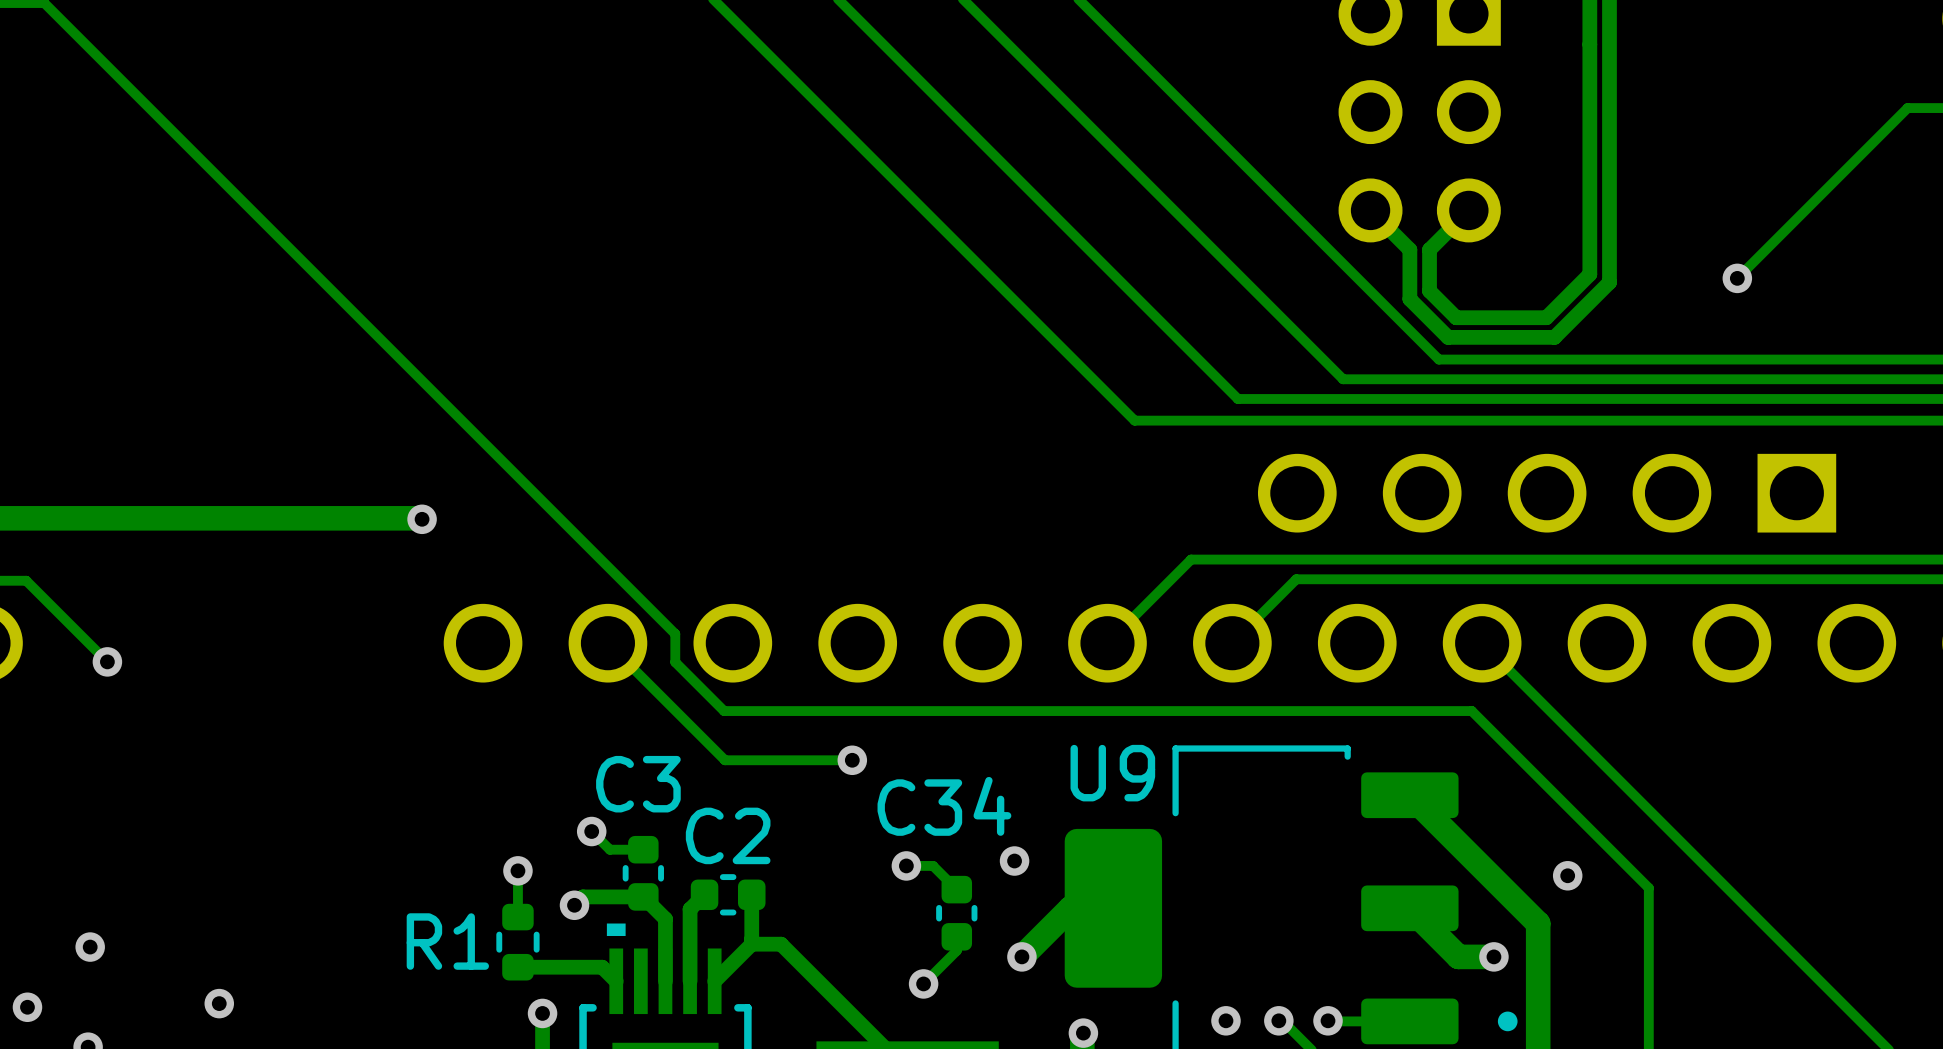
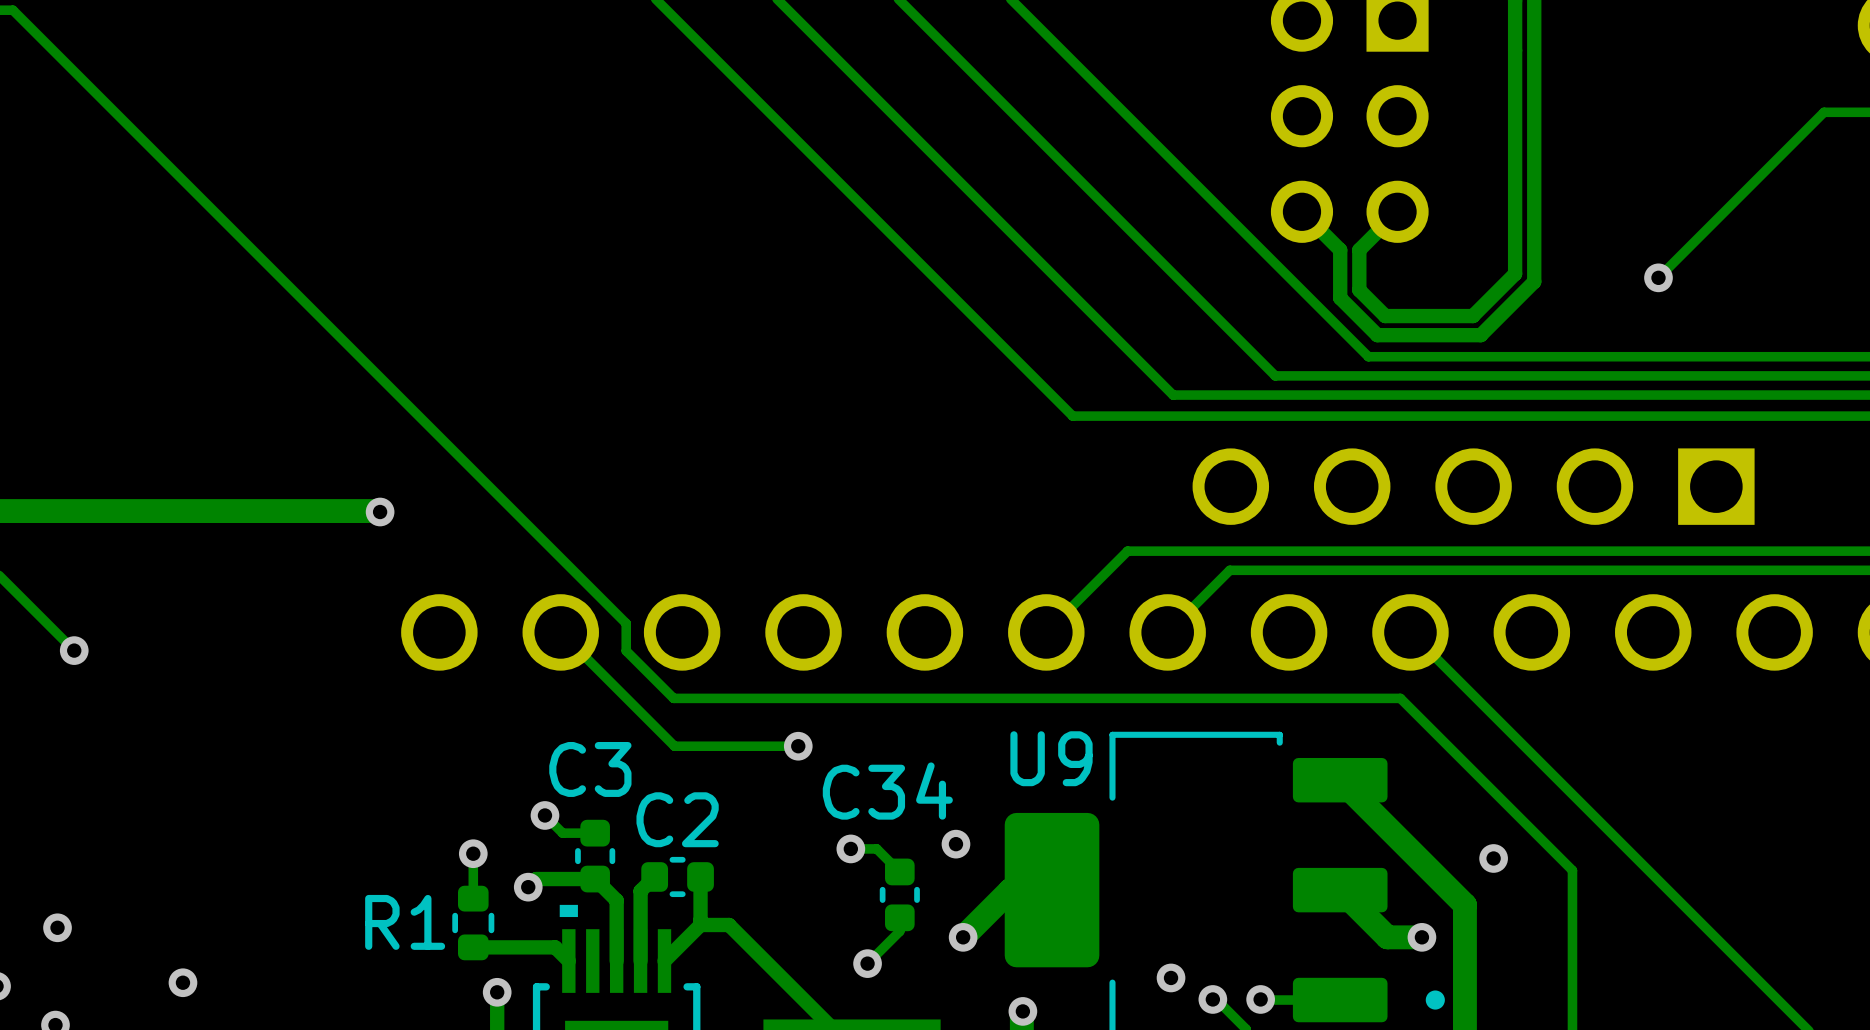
via position: (1225, 1020) -> (1171, 977)

